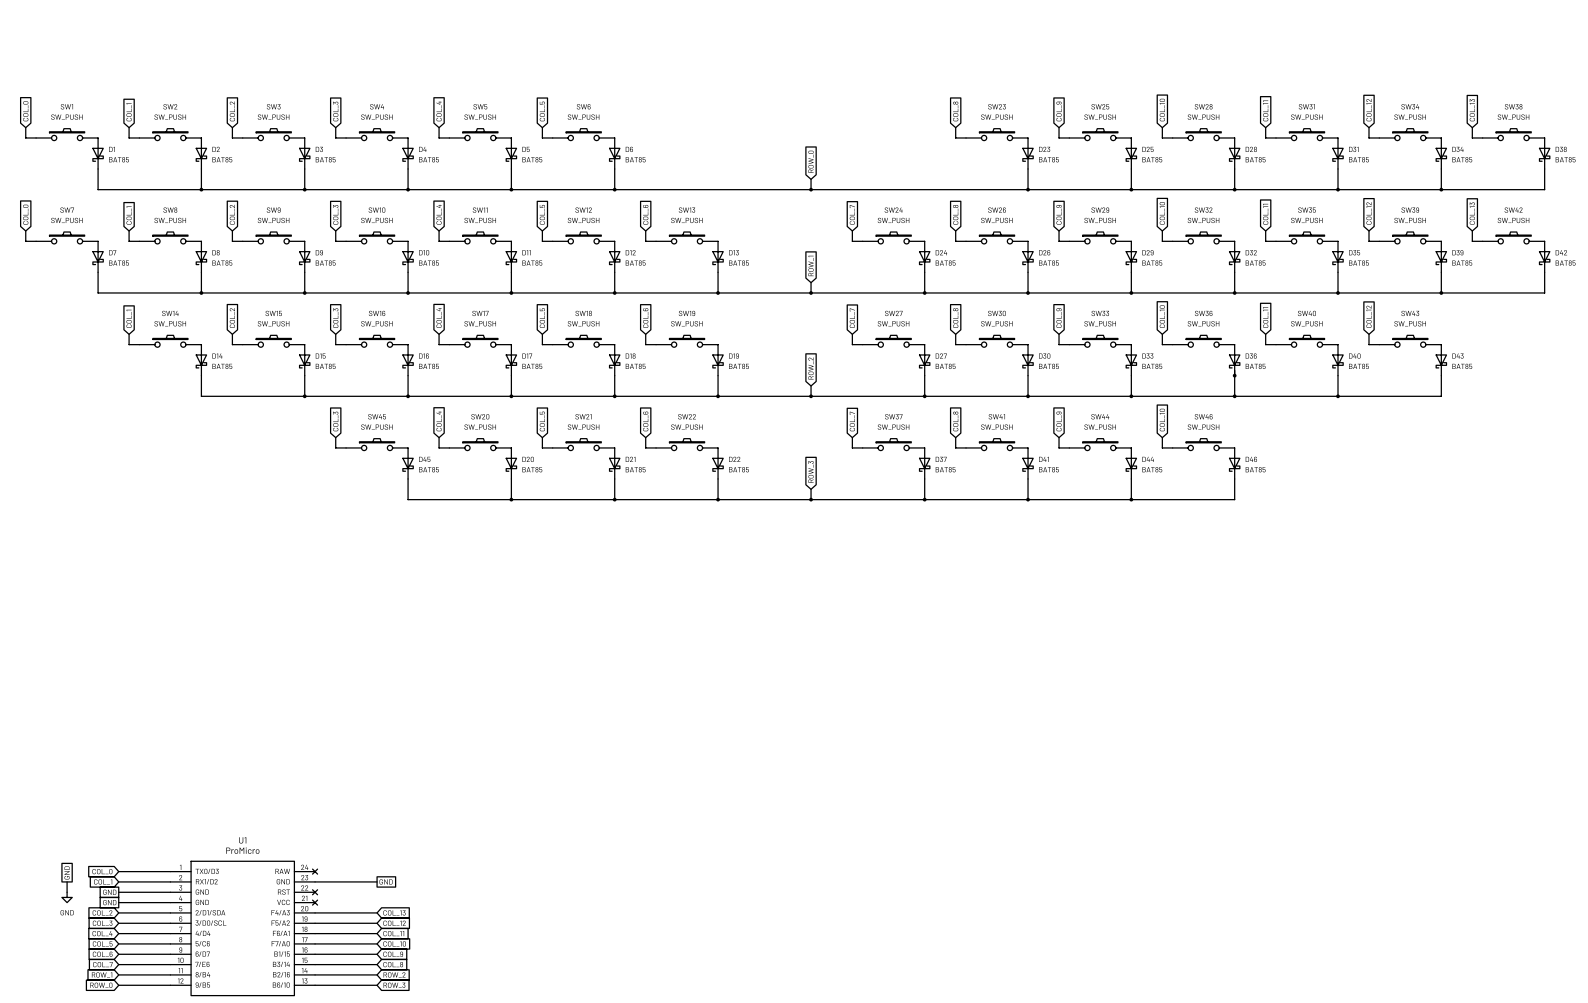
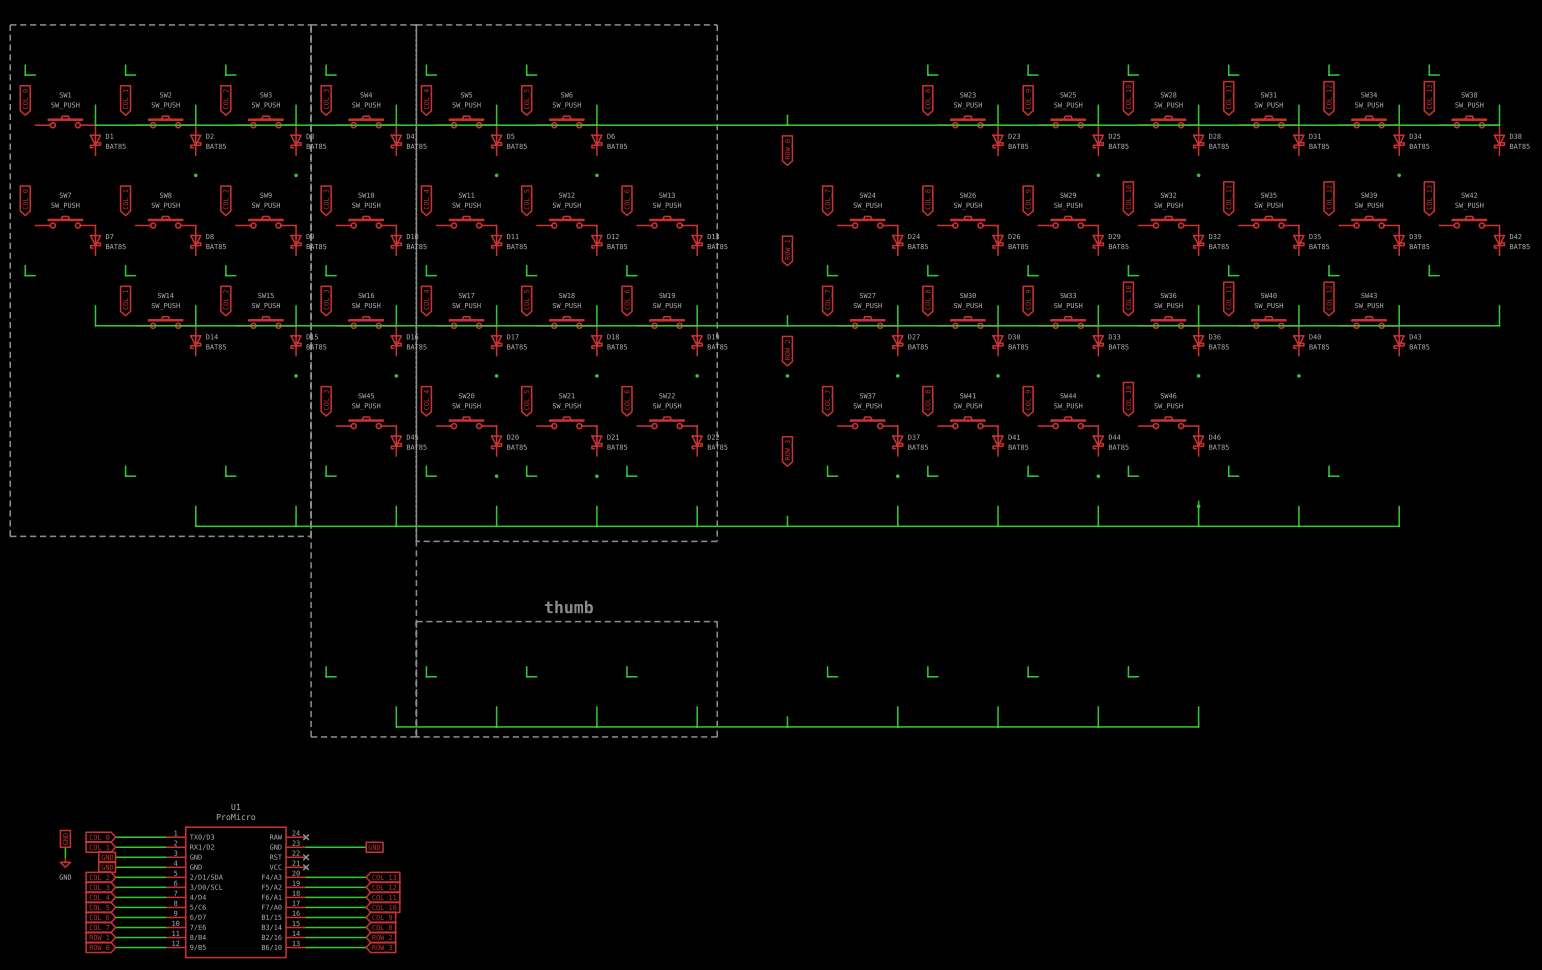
line: none -> (311, 24) (311, 736) (717, 736) (717, 621) (416, 621)
line: none -> (416, 24) (416, 736)
wire: none -> (125, 65) (125, 75) (135, 75)
wire: none -> (225, 65) (225, 75) (235, 75)
wire: none -> (326, 65) (326, 75) (336, 75)
wire: none -> (426, 65) (426, 75) (436, 75)
wire: none -> (526, 65) (526, 75) (536, 75)
wire: none -> (927, 65) (927, 75) (937, 75)
wire: none -> (1028, 65) (1028, 75) (1038, 75)
wire: none -> (1128, 65) (1128, 75) (1138, 75)
wire: none -> (1228, 65) (1228, 75) (1238, 75)
wire: none -> (1328, 65) (1328, 75) (1339, 75)
wire: none -> (1429, 65) (1429, 75) (1439, 75)
wire: none -> (1499, 105) (1499, 125) (1439, 125)
wire: (25, 127) (25, 137) (36, 137) -> (25, 65) (25, 75) (35, 75)
wire: (129, 127) (129, 137) -> (95, 105) (95, 125) (125, 125)
wire: (232, 127) (232, 137) -> (135, 125) (225, 125)
wire: (335, 127) (335, 137) -> (235, 125) (326, 125)
wire: (439, 127) (439, 137) -> (336, 125) (426, 125)
wire: (542, 127) (542, 137) -> (436, 125) (526, 125)
wire: (955, 127) (955, 137) -> (536, 125) (927, 125)
wire: (1059, 127) (1059, 137) -> (937, 125) (1028, 125)
wire: (1162, 127) (1162, 137) -> (1038, 125) (1128, 125)
wire: (1265, 127) (1265, 137) -> (1138, 125) (1228, 125)
wire: (1368, 127) (1368, 137) -> (1238, 125) (1328, 125)
wire: (1472, 127) (1472, 137) -> (1339, 125) (1429, 125)
wire: (98, 168) (98, 189) (1544, 189) (1544, 168) -> none
wire: (201, 168) (201, 189) -> (195, 105) (195, 125)
wire: (304, 168) (304, 189) -> (296, 105) (296, 125)
wire: (408, 168) (408, 189) -> (396, 105) (396, 125)
wire: (511, 168) (511, 189) -> (496, 105) (496, 125)
wire: (614, 168) (614, 189) -> (596, 105) (596, 125)
wire: (1028, 168) (1028, 189) -> (998, 105) (998, 125)
wire: (1131, 168) (1131, 189) -> (1098, 105) (1098, 125)
wire: (1234, 168) (1234, 189) -> (1198, 105) (1198, 125)
wire: (1338, 168) (1338, 189) -> (1298, 105) (1298, 125)
wire: (1441, 168) (1441, 189) -> (1399, 105) (1399, 125)
wire: (811, 179) (811, 189) -> (787, 115) (787, 125)
junction: (408, 189) -> none
junction: (811, 189) -> none
junction: (1028, 189) -> none
junction: (1338, 189) -> none
wire: (25, 230) (25, 241) (36, 241) -> (25, 265) (25, 275) (35, 275)
wire: (129, 230) (129, 241) (139, 241) -> none
wire: (232, 230) (232, 241) (242, 241) -> none
wire: (335, 230) (335, 241) (346, 241) -> none
wire: (439, 230) (439, 241) (449, 241) -> none
wire: (542, 230) (542, 241) (552, 241) -> none
wire: (645, 230) (645, 241) (656, 241) -> none
wire: (852, 230) (852, 241) (862, 241) -> none
wire: (955, 230) (955, 241) (966, 241) -> none
wire: (1059, 230) (1059, 241) (1069, 241) -> none
wire: (1162, 230) (1162, 241) (1172, 241) -> none
wire: (1265, 230) (1265, 241) (1276, 241) -> none
wire: (1368, 230) (1368, 241) (1379, 241) -> none
wire: (1472, 230) (1472, 241) (1482, 241) -> none
wire: (98, 272) (98, 292) (129, 292) -> (125, 265) (125, 275)
wire: (201, 272) (201, 292) -> (195, 305) (195, 325)
wire: (304, 272) (304, 292) -> (296, 305) (296, 325)
wire: (408, 272) (408, 292) -> (396, 305) (396, 325)
wire: (511, 272) (511, 292) -> (496, 305) (496, 325)
wire: (614, 272) (614, 292) -> (596, 305) (596, 325)
wire: (718, 272) (718, 292) -> (697, 305) (697, 325)
wire: (924, 272) (924, 292) -> (897, 305) (897, 325)
wire: (1028, 272) (1028, 292) -> (998, 305) (998, 325)
wire: (1131, 272) (1131, 292) -> (1098, 305) (1098, 325)
wire: (1234, 272) (1234, 292) -> (1198, 305) (1198, 325)
wire: (1338, 272) (1338, 292) -> (1298, 305) (1298, 325)
wire: (1441, 272) (1441, 292) -> (1399, 305) (1399, 325)
wire: (1544, 272) (1544, 292) (1482, 292) -> none
wire: (811, 282) (811, 292) -> (787, 315) (787, 325)
wire: (139, 292) (232, 292) -> (225, 265) (225, 275)
junction: (201, 292) -> none
wire: (242, 292) (335, 292) -> (326, 265) (326, 275)
junction: (304, 292) -> none
wire: (346, 292) (439, 292) -> (426, 265) (426, 275)
junction: (408, 292) -> none
wire: (449, 292) (542, 292) -> (526, 265) (526, 275)
junction: (511, 292) -> none
wire: (552, 292) (645, 292) -> (626, 265) (626, 275)
junction: (614, 292) -> none
wire: (656, 292) (852, 292) -> (827, 265) (827, 275)
junction: (718, 292) -> none
junction: (811, 292) -> none
wire: (862, 292) (955, 292) -> (927, 265) (927, 275)
junction: (924, 292) -> none
wire: (966, 292) (1059, 292) -> (1028, 265) (1028, 275)
junction: (1028, 292) -> none
wire: (1069, 292) (1162, 292) -> (1128, 265) (1128, 275)
junction: (1131, 292) -> none
wire: (1172, 292) (1265, 292) -> (1228, 265) (1228, 275)
junction: (1234, 292) -> none
wire: (1276, 292) (1368, 292) -> (1328, 265) (1328, 275)
junction: (1338, 292) -> none
wire: (1379, 292) (1472, 292) -> (1429, 265) (1429, 275)
junction: (1441, 292) -> none
wire: none -> (1499, 305) (1499, 325) (1339, 325)
wire: (129, 334) (129, 344) -> (95, 305) (95, 325) (125, 325)
wire: (232, 334) (232, 344) -> (135, 325) (225, 325)
wire: (335, 334) (335, 344) -> (235, 325) (326, 325)
wire: (439, 334) (439, 344) -> (336, 325) (426, 325)
wire: (542, 334) (542, 344) -> (436, 325) (526, 325)
wire: (645, 334) (645, 344) -> (536, 325) (626, 325)
wire: (852, 334) (852, 344) -> (637, 325) (827, 325)
wire: (955, 334) (955, 344) -> (837, 325) (927, 325)
wire: (1059, 334) (1059, 344) -> (937, 325) (1028, 325)
wire: (1162, 334) (1162, 344) -> (1038, 325) (1128, 325)
wire: (1265, 334) (1265, 344) -> (1138, 325) (1228, 325)
wire: (1368, 334) (1368, 344) -> (1238, 325) (1328, 325)
wire: (1234, 370) (1234, 396) -> none
wire: (201, 375) (201, 396) (1441, 396) (1441, 375) -> none
wire: (304, 375) (304, 396) -> none
wire: (408, 375) (408, 396) -> none
wire: (511, 375) (511, 396) -> none
wire: (614, 375) (614, 396) -> none
wire: (718, 375) (718, 396) -> none
wire: (924, 375) (924, 396) -> none
wire: (1028, 375) (1028, 396) -> none
wire: (1131, 375) (1131, 396) -> none
junction: (1234, 375) -> none
wire: (1338, 375) (1338, 396) -> none
wire: (811, 385) (811, 396) -> none
wire: (335, 437) (335, 447) (346, 447) -> (326, 466) (326, 476) (336, 476)
wire: (439, 437) (439, 447) (449, 447) -> none
wire: (542, 437) (542, 447) (552, 447) -> none
wire: (645, 437) (645, 447) (656, 447) -> none
wire: (852, 437) (852, 447) (862, 447) -> none
wire: (955, 437) (955, 447) (966, 447) -> none
wire: (1059, 437) (1059, 447) (1069, 447) -> none
wire: (1162, 437) (1162, 447) (1172, 447) -> none
wire: (408, 478) (408, 499) (439, 499) -> (426, 466) (426, 476)
wire: (511, 478) (511, 499) -> (496, 506) (496, 526)
wire: (614, 478) (614, 499) -> (596, 506) (596, 526)
wire: (718, 478) (718, 499) -> (697, 506) (697, 526)
wire: (924, 478) (924, 499) -> (897, 506) (897, 526)
wire: (1028, 478) (1028, 499) -> (998, 506) (998, 526)
wire: (1131, 478) (1131, 499) -> (1098, 506) (1098, 526)
wire: (1234, 478) (1234, 499) (1172, 499) -> none
wire: none -> (125, 466) (125, 476) (135, 476)
wire: none -> (225, 466) (225, 476) (235, 476)
wire: (811, 489) (811, 499) -> (787, 516) (787, 526)
wire: none -> (1228, 466) (1228, 476) (1238, 476)
wire: none -> (1328, 466) (1328, 476) (1339, 476)
wire: (449, 499) (542, 499) -> (526, 466) (526, 476)
wire: (552, 499) (645, 499) -> (626, 466) (626, 476)
wire: (656, 499) (852, 499) -> (827, 466) (827, 476)
junction: (718, 499) -> none
junction: (811, 499) -> none
wire: (862, 499) (955, 499) -> (927, 466) (927, 476)
wire: (966, 499) (1059, 499) -> (1028, 466) (1028, 476)
junction: (1028, 499) -> none
wire: (1069, 499) (1162, 499) -> (1128, 466) (1128, 476)
wire: none -> (1198, 501) (1198, 526)
wire: none -> (195, 506) (195, 526) (1399, 526) (1399, 506)
wire: none -> (296, 506) (296, 526)
wire: none -> (396, 506) (396, 526)
junction: none -> (1198, 506)
wire: none -> (1298, 506) (1298, 526)
line: none -> (311, 536) (10, 536) (10, 24) (717, 24) (717, 541) (416, 541)
text: none -> thumb (568, 607)
wire: none -> (326, 666) (326, 676) (336, 676)
wire: none -> (426, 666) (426, 676) (436, 676)
wire: none -> (526, 666) (526, 676) (536, 676)
wire: none -> (626, 666) (626, 676) (637, 676)
wire: none -> (827, 666) (827, 676) (837, 676)
wire: none -> (927, 666) (927, 676) (937, 676)
wire: none -> (1028, 666) (1028, 676) (1038, 676)
wire: none -> (1128, 666) (1128, 676) (1138, 676)
wire: none -> (396, 706) (396, 726) (1198, 726) (1198, 706)
wire: none -> (496, 706) (496, 726)
wire: none -> (596, 706) (596, 726)
wire: none -> (697, 706) (697, 726)
wire: none -> (897, 706) (897, 726)
wire: none -> (998, 706) (998, 726)
wire: none -> (1098, 706) (1098, 726)
wire: none -> (787, 716) (787, 726)

